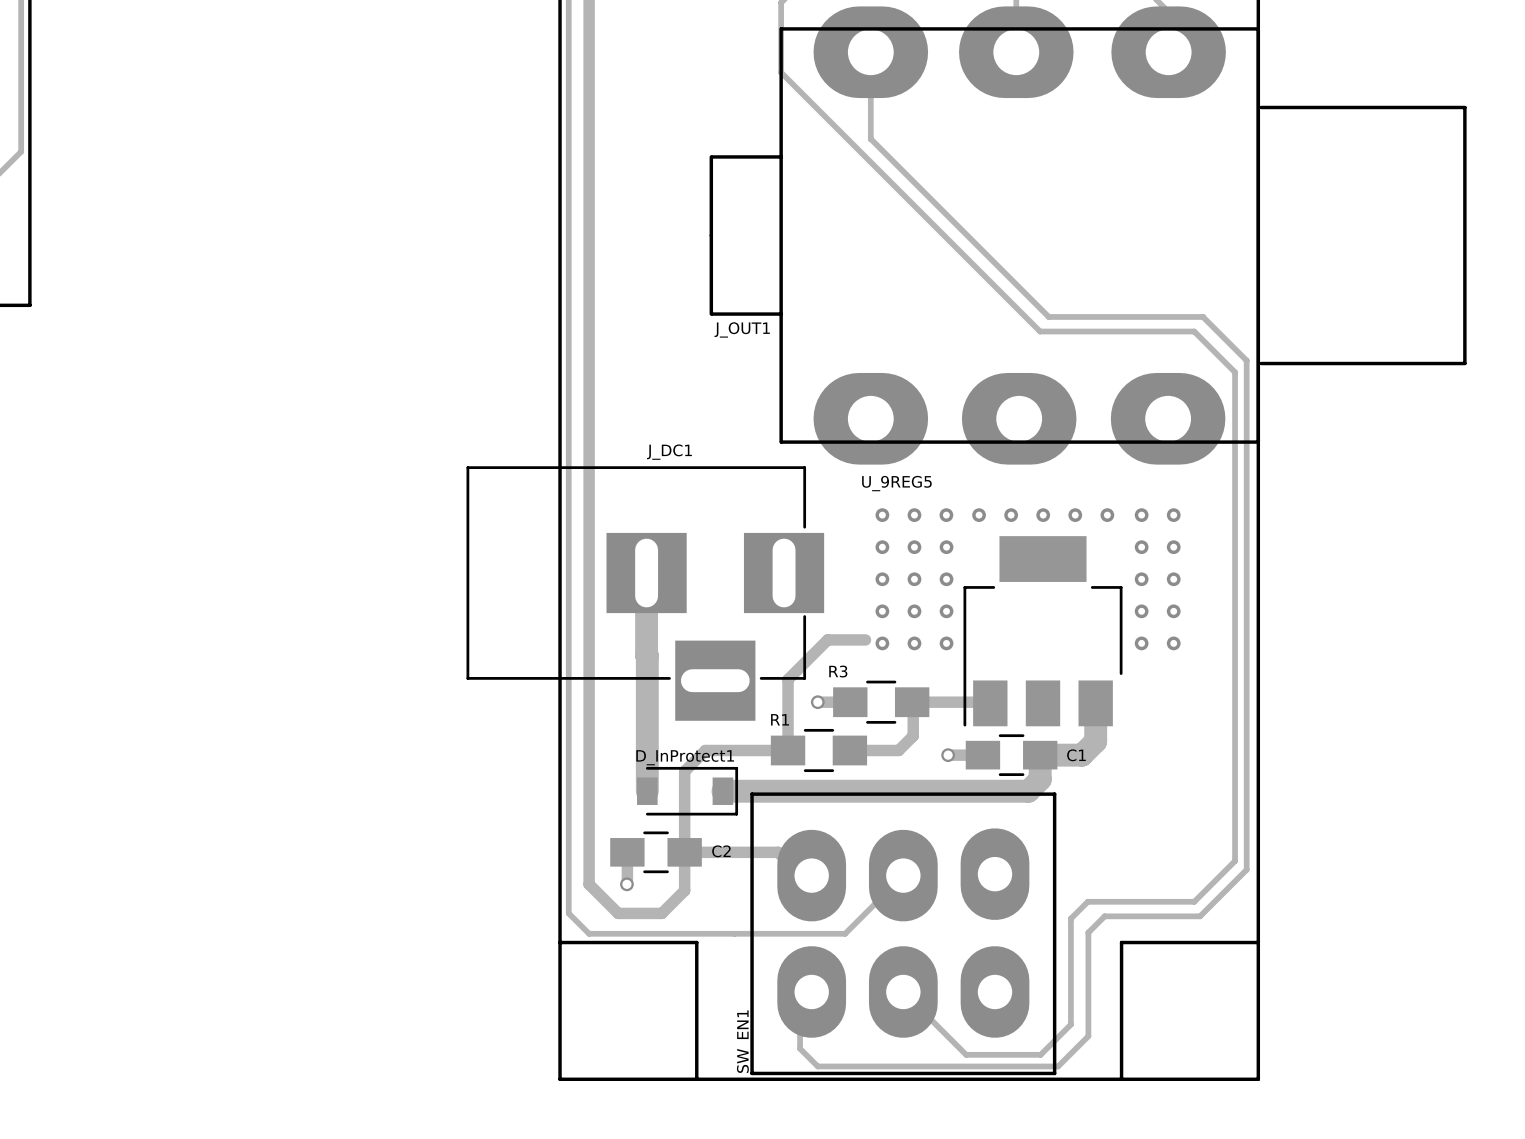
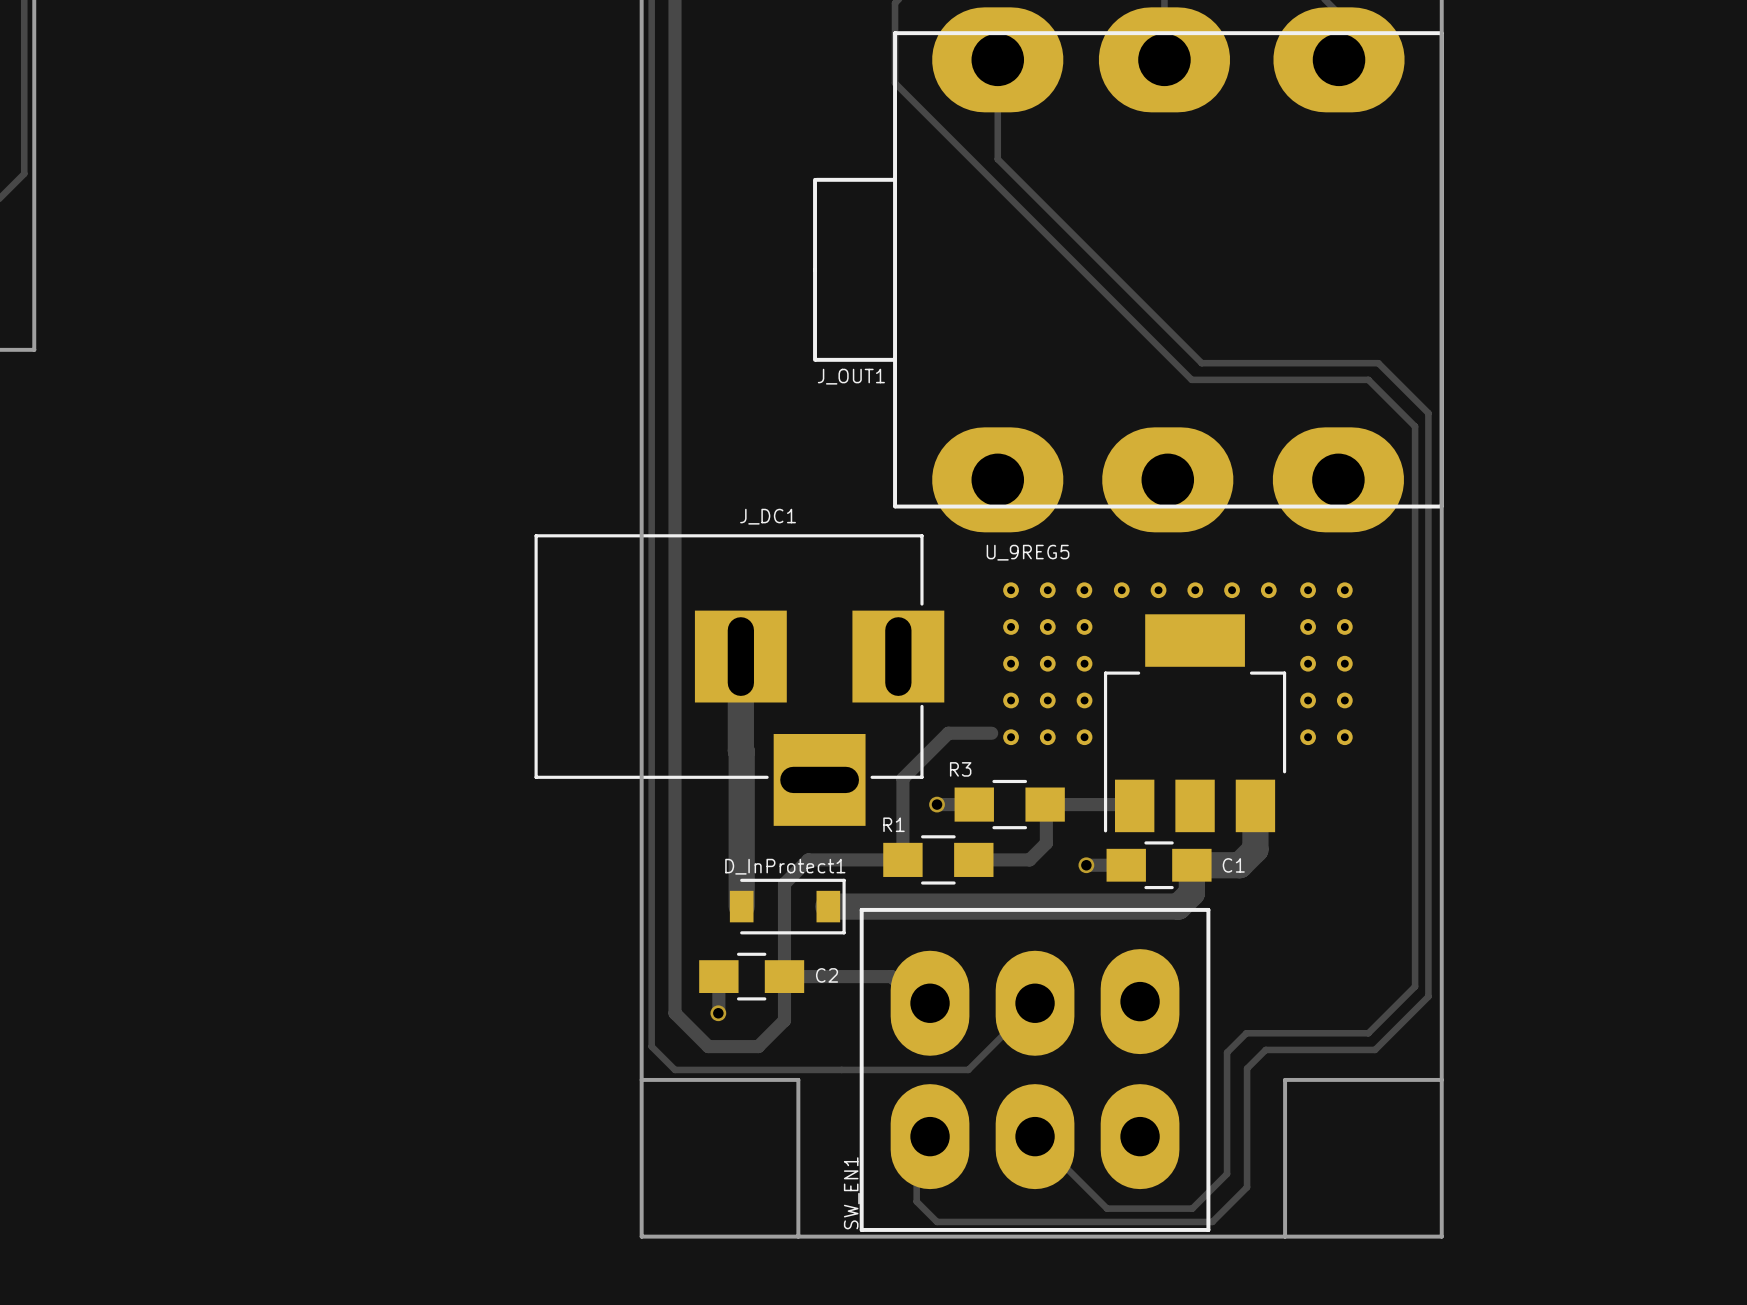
J_OUT1 footprint: [709, 6, 1467, 465] -> [813, 7, 1444, 533]

